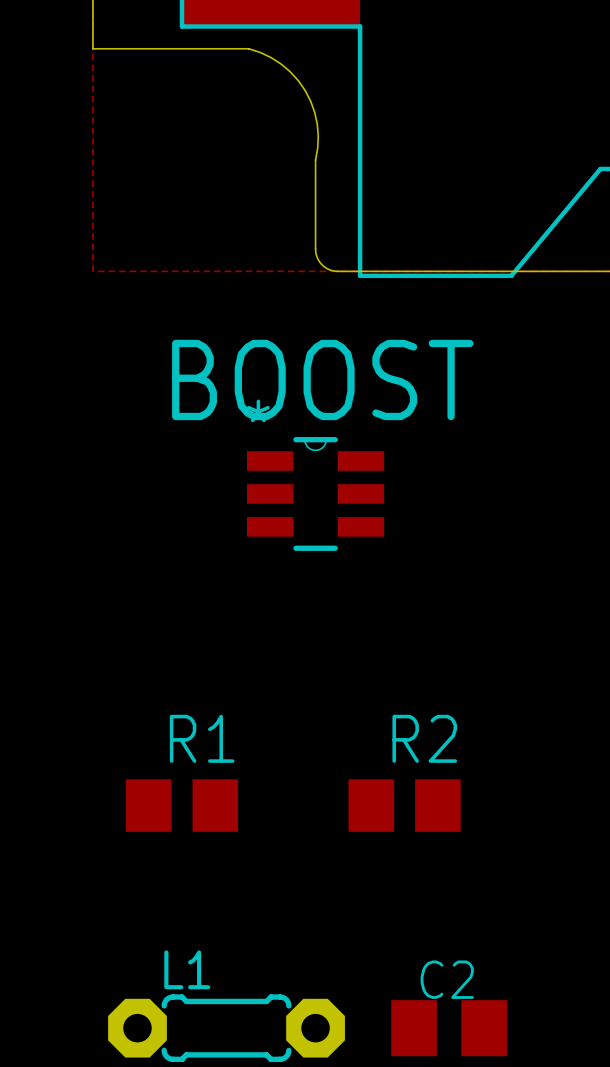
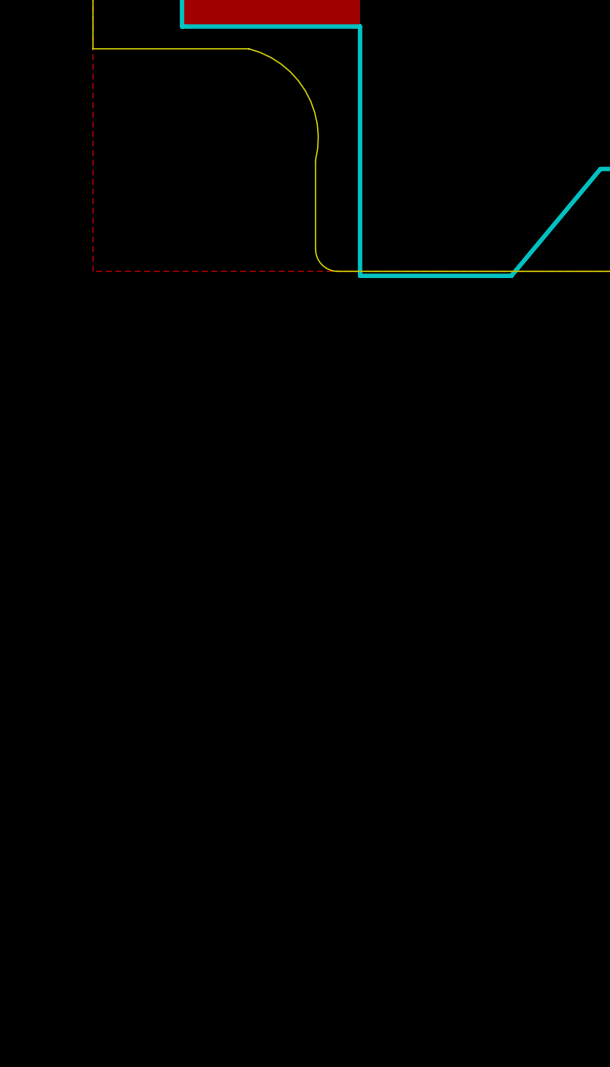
BOOST: (315, 493) -> none
R1: (182, 805) -> none
R2: (404, 805) -> none
L1: (226, 1028) -> none
C2: (449, 1028) -> none

